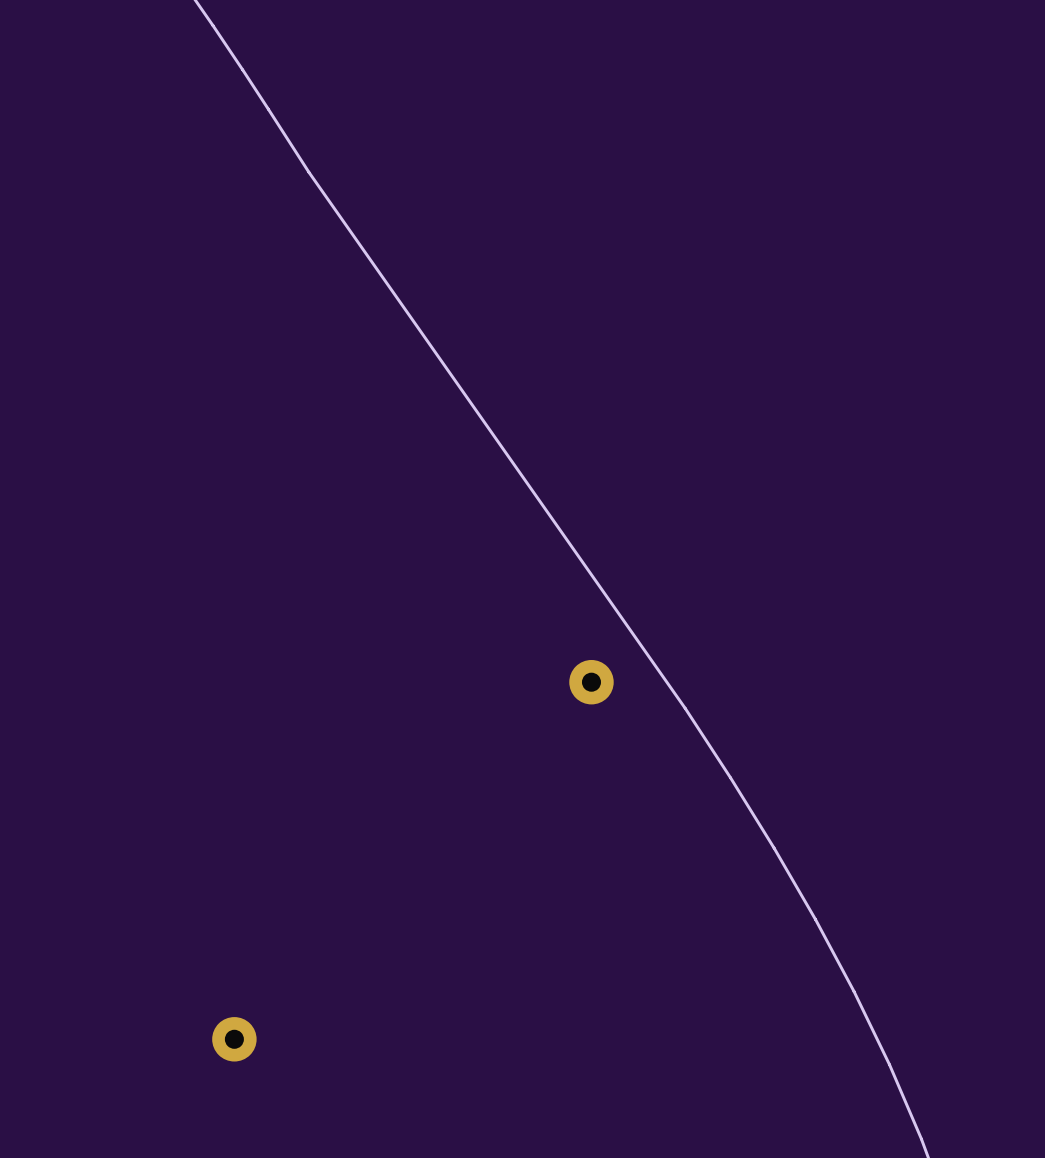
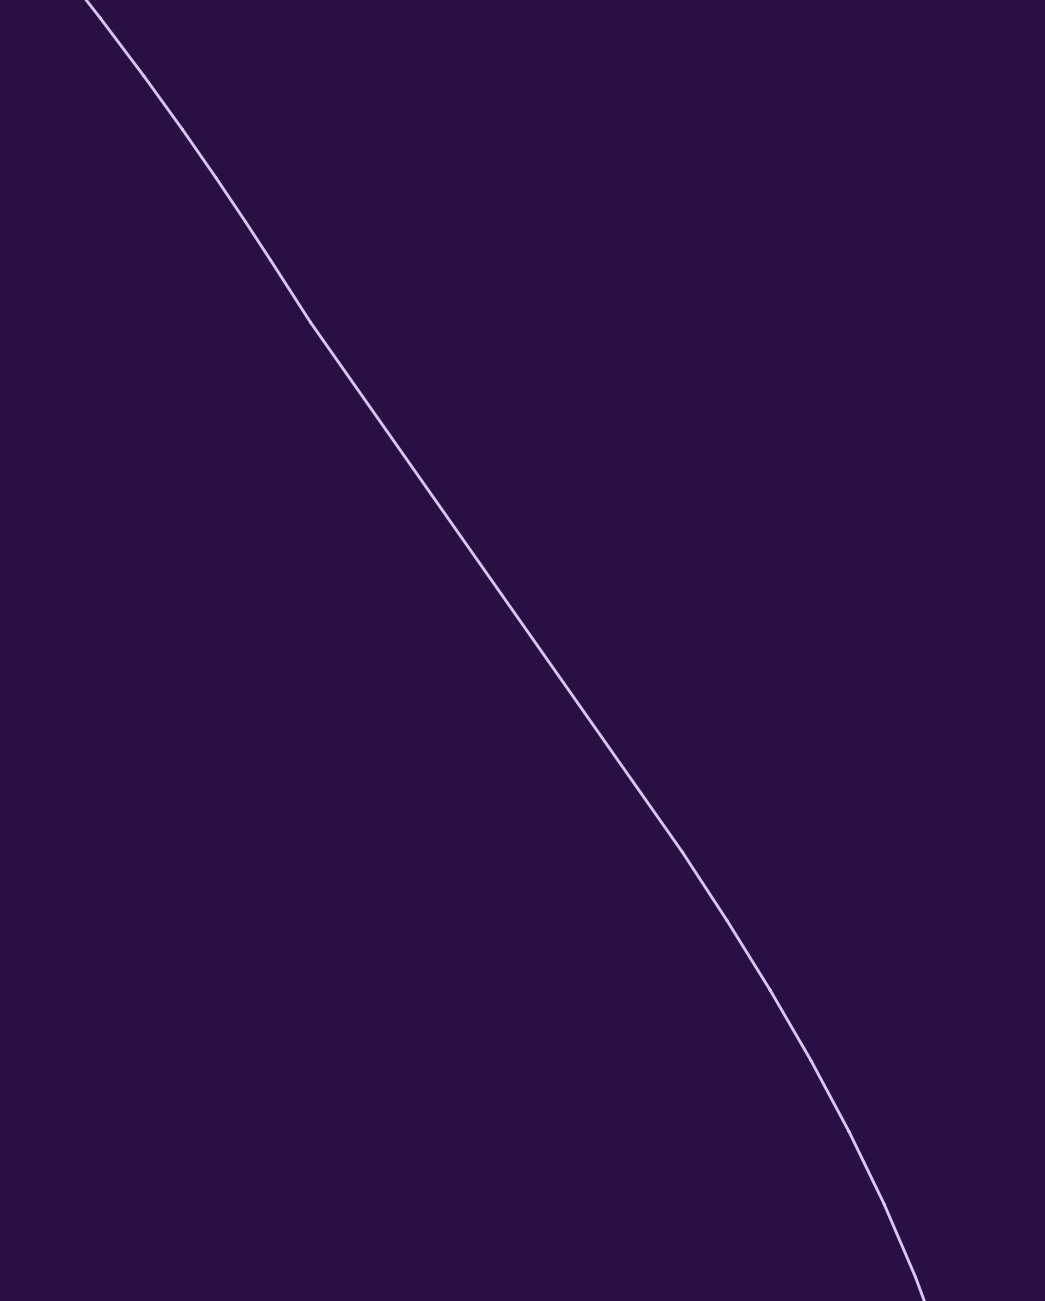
via: (591, 682) -> none
via: (234, 1039) -> none

